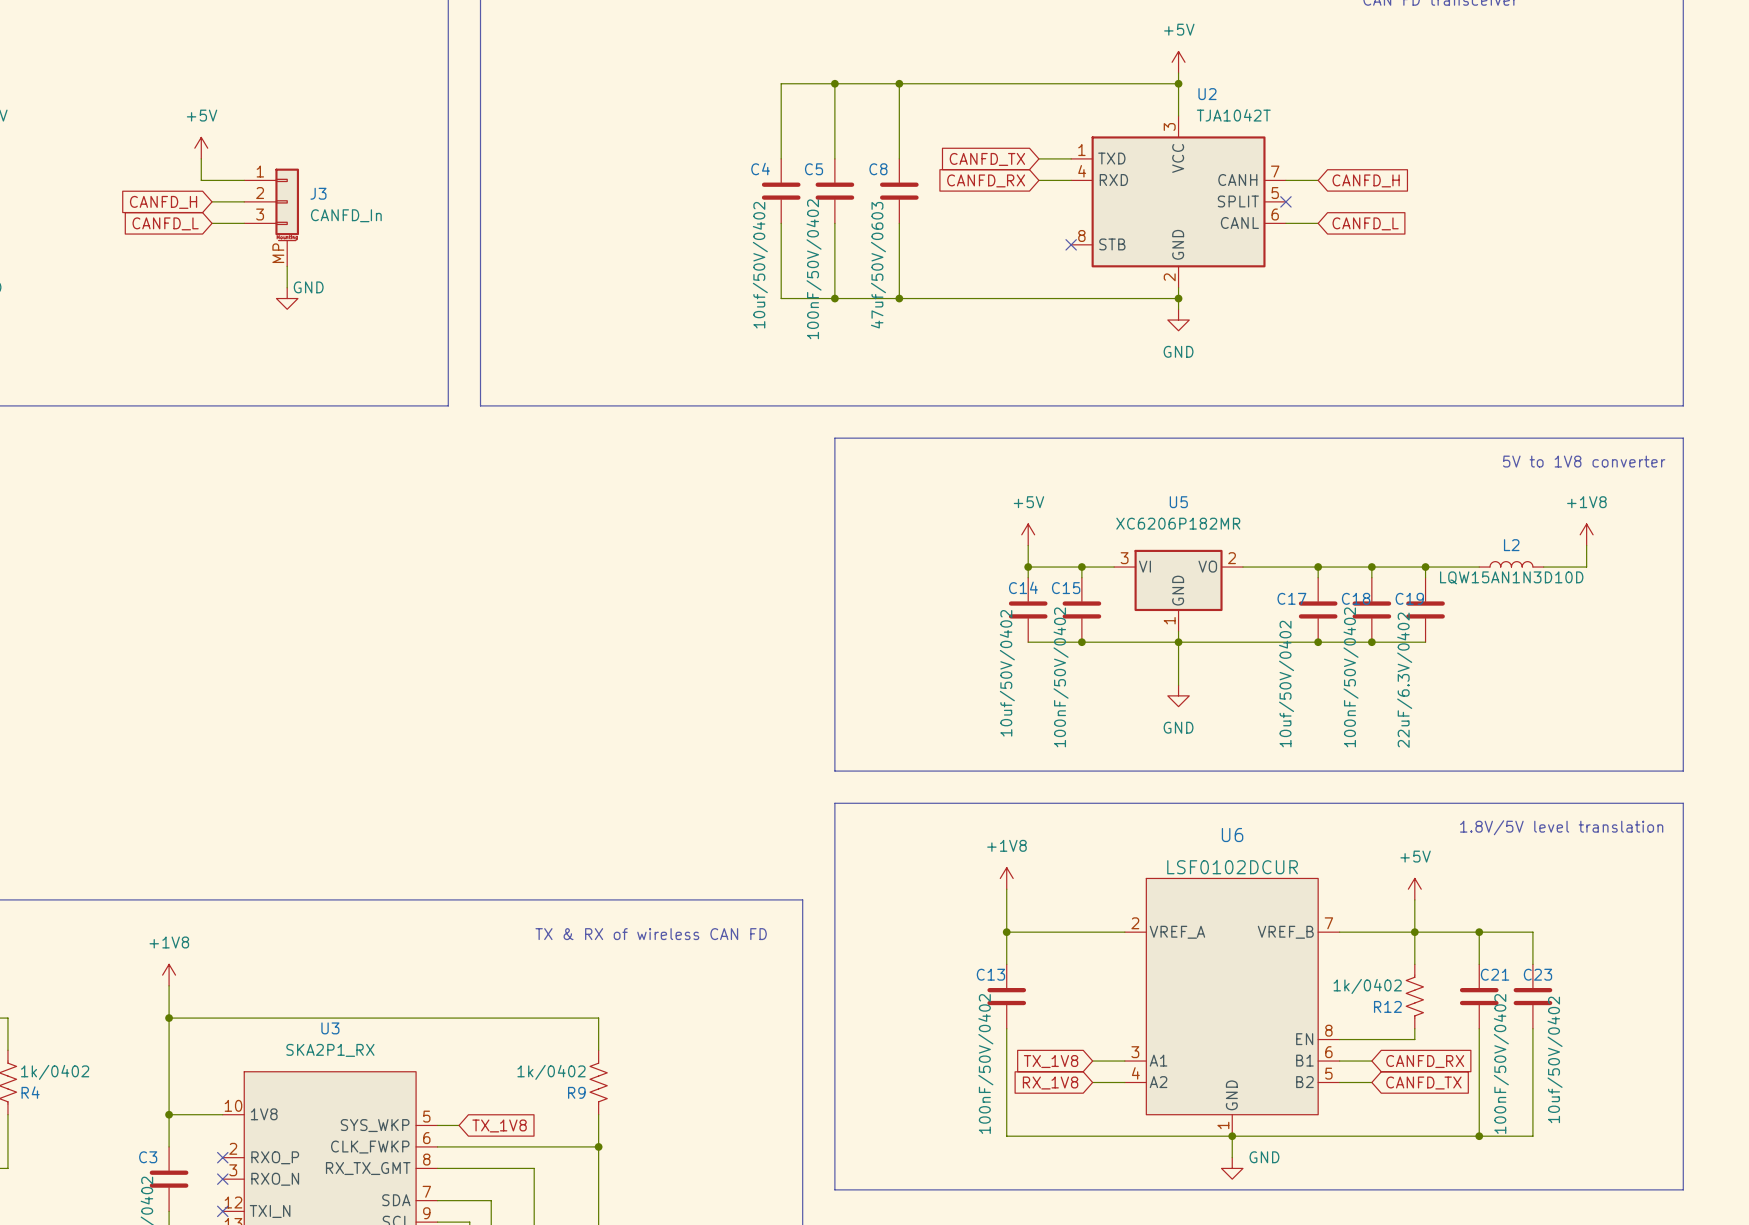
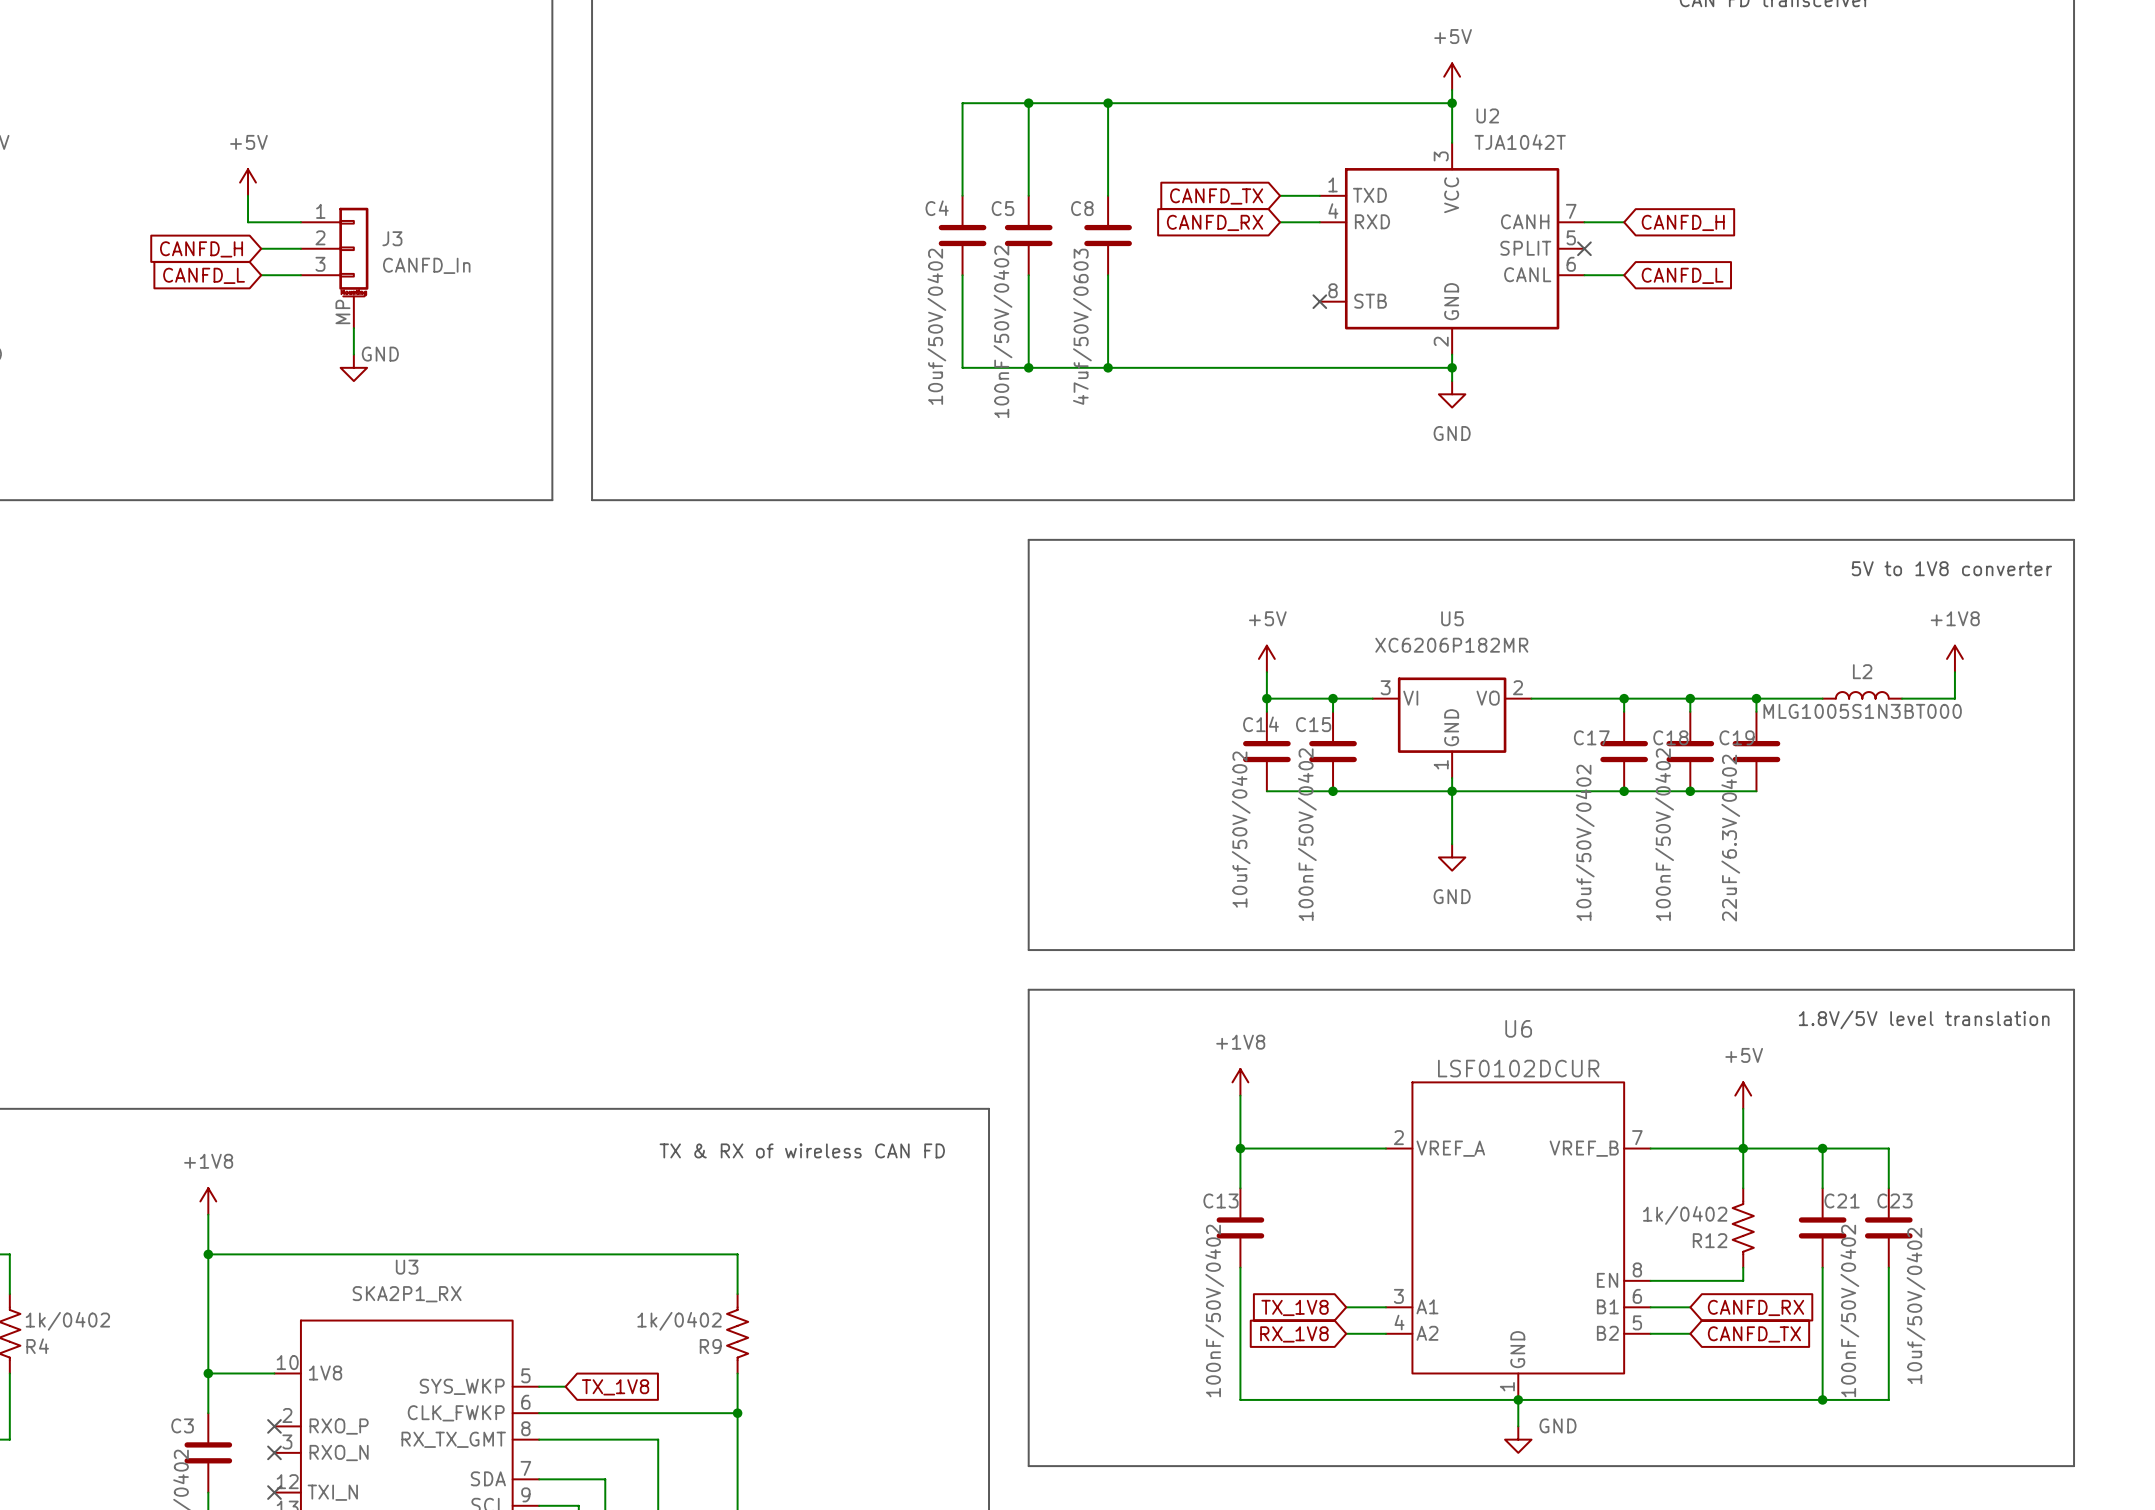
L2 value: LQW15AN1N3D10D (1511, 577) -> MLG1005S1N3BT000 (1862, 711)

